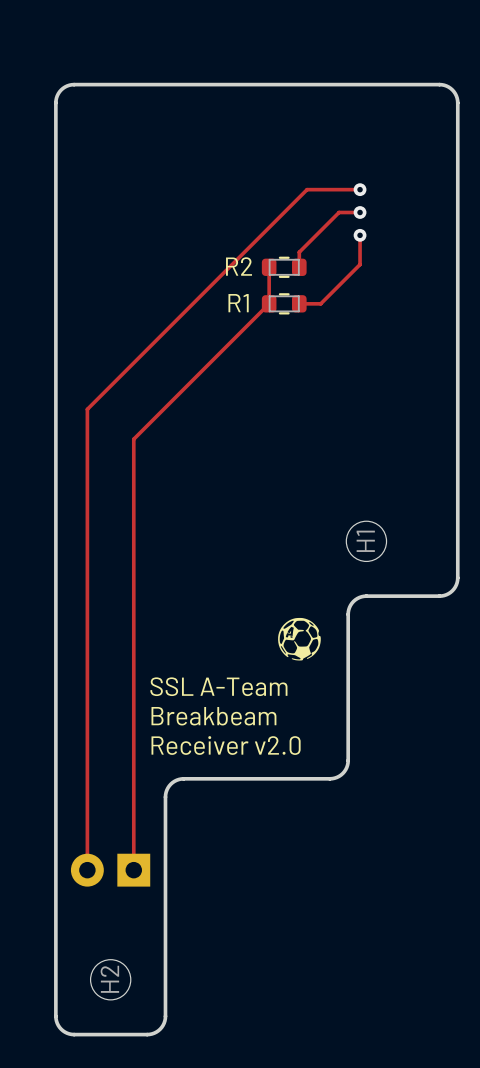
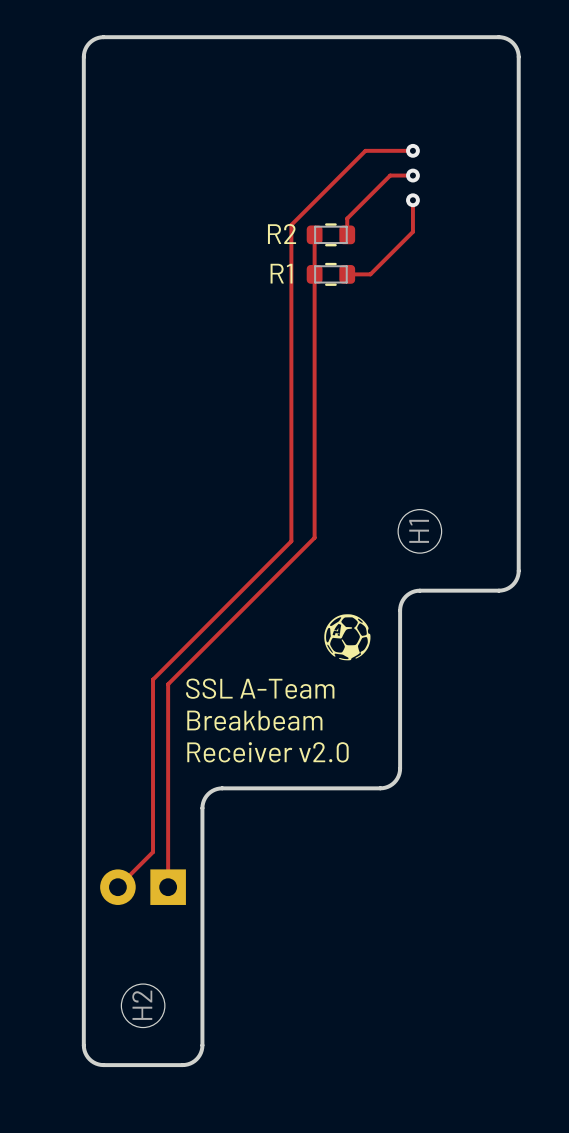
track: (316, 189) (307, 189) (87, 409) (87, 870) -> (365, 150) (291, 224) (291, 541) (153, 679) (153, 852) (117, 887)
track: (269, 303) (133, 439) (133, 682) -> (314, 274) (314, 537) (168, 684)

